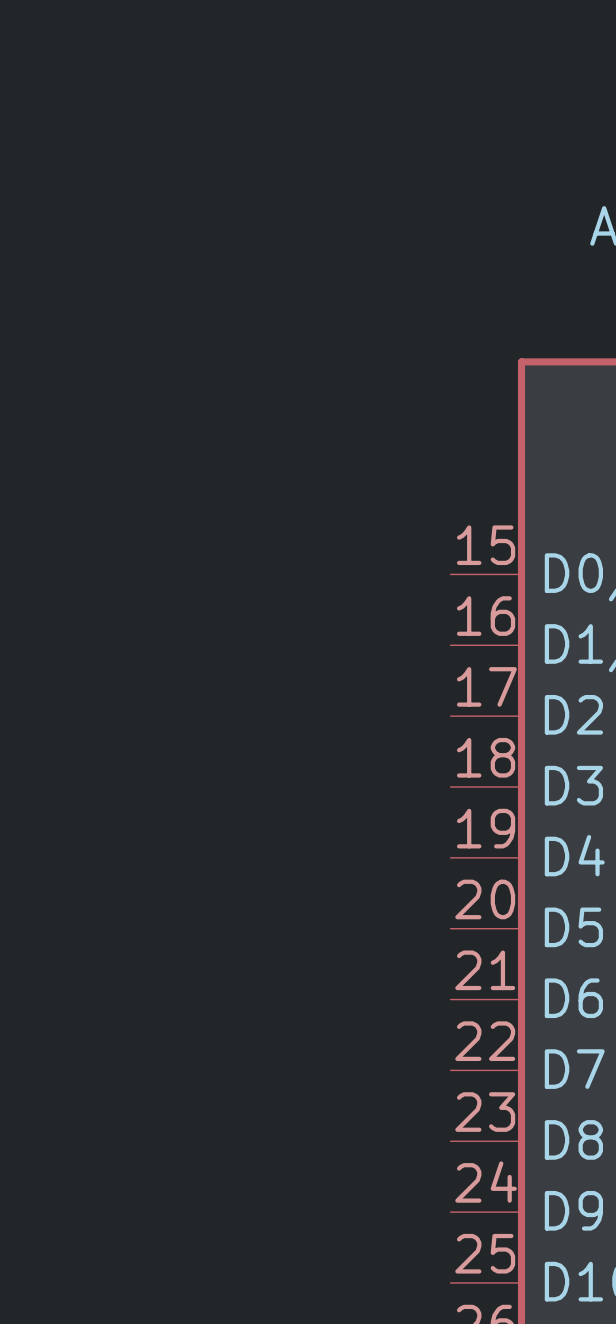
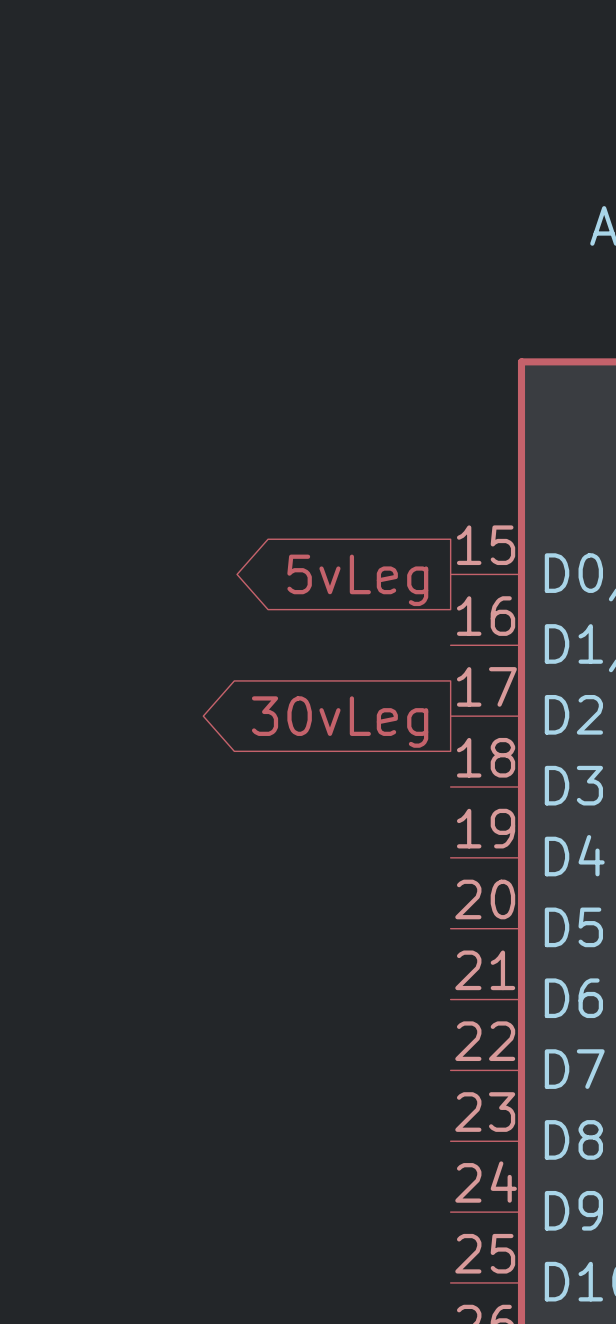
global label: none -> 5vLeg (357, 580)
global label: none -> 30vLeg (340, 722)

